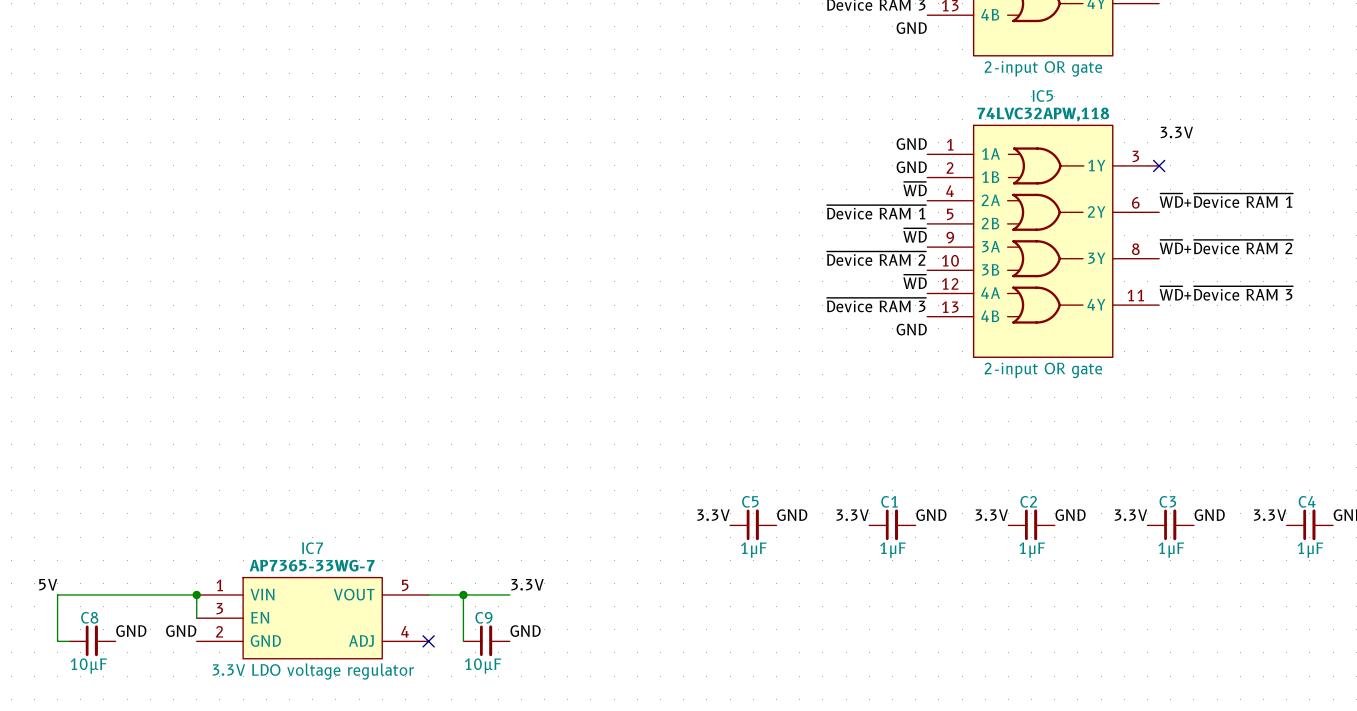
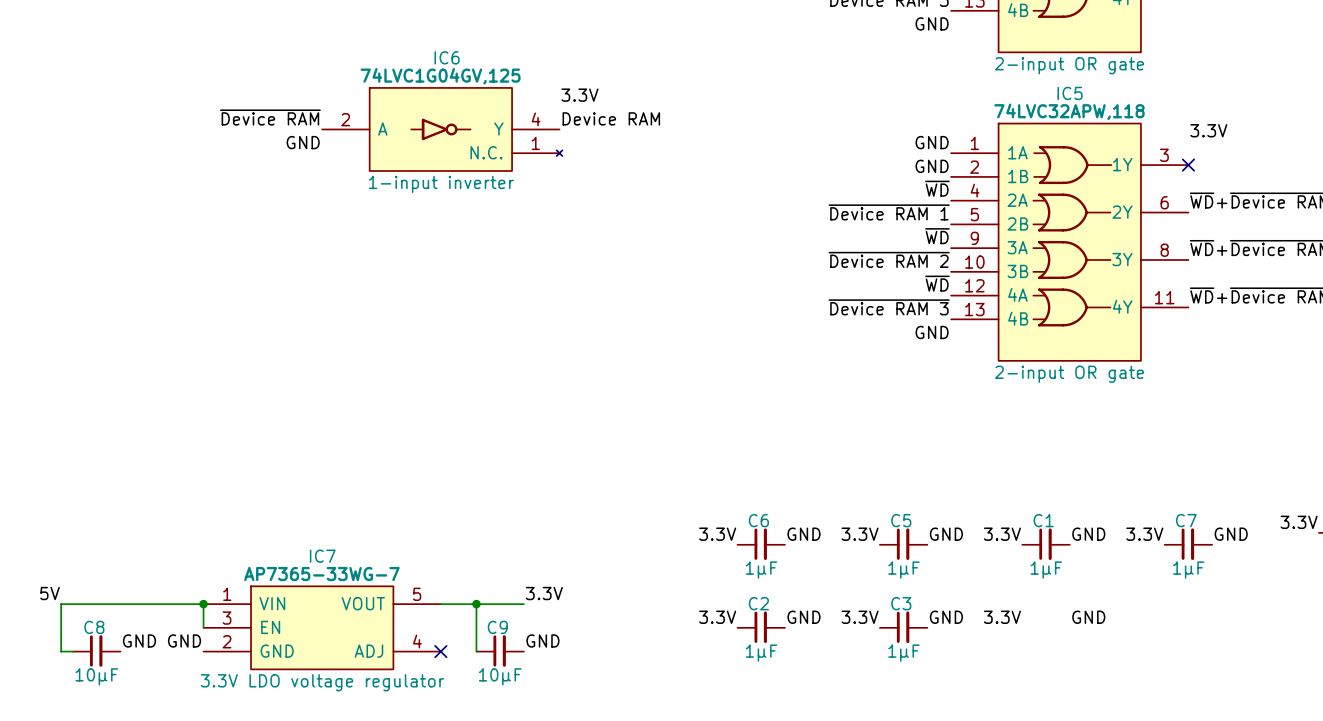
label: none -> 3.3V (579, 95)
label: none -> ~{Device RAM} (270, 117)
label: none -> Device RAM (611, 118)
IC6: none -> 74LVC1G04GV,125 (442, 129)
label: none -> GND (303, 142)
label position: 3.3V (713, 515) -> 3.3V (717, 534)
label position: GND (792, 515) -> GND (804, 534)
label position: 3.3V (852, 515) -> 3.3V (860, 534)
label position: GND (931, 515) -> GND (946, 534)
label position: 3.3V (991, 515) -> 3.3V (1002, 534)
label position: GND (1070, 515) -> GND (1088, 534)
label position: 3.3V (1130, 515) -> 3.3V (1144, 534)
label position: GND (1209, 515) -> GND (1231, 534)
C5 position: (753, 524) -> (903, 544)
C1 position: (892, 524) -> (1046, 544)
C2 position: (1031, 524) -> (761, 627)
C3 position: (1170, 524) -> (903, 627)
C6: none -> 1μF (761, 544)
C7: none -> 1μF (1188, 544)
label: none -> 3.3V (717, 617)
label: none -> GND (804, 617)
label: none -> 3.3V (860, 617)
label: none -> GND (946, 617)
label: none -> 3.3V (1002, 617)
label: none -> GND (1088, 617)

